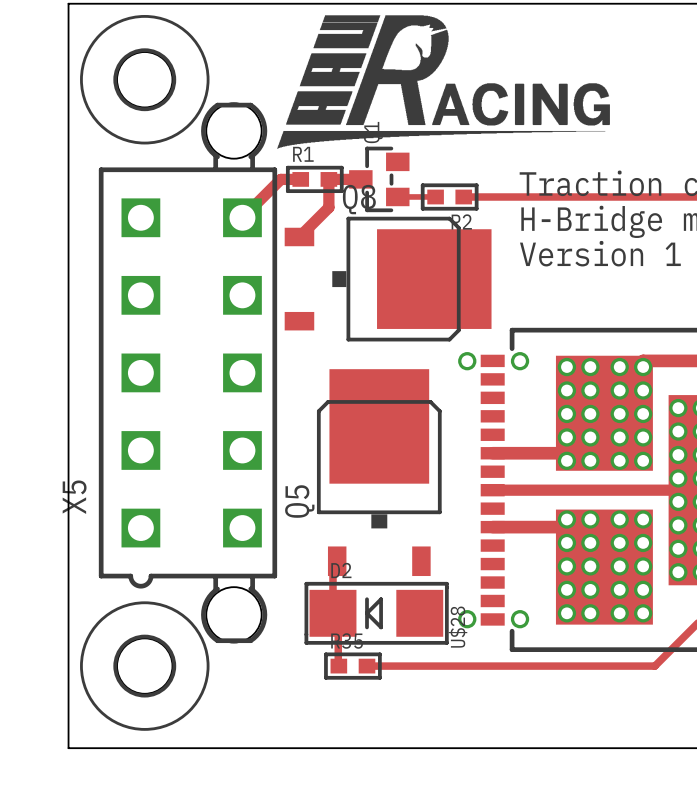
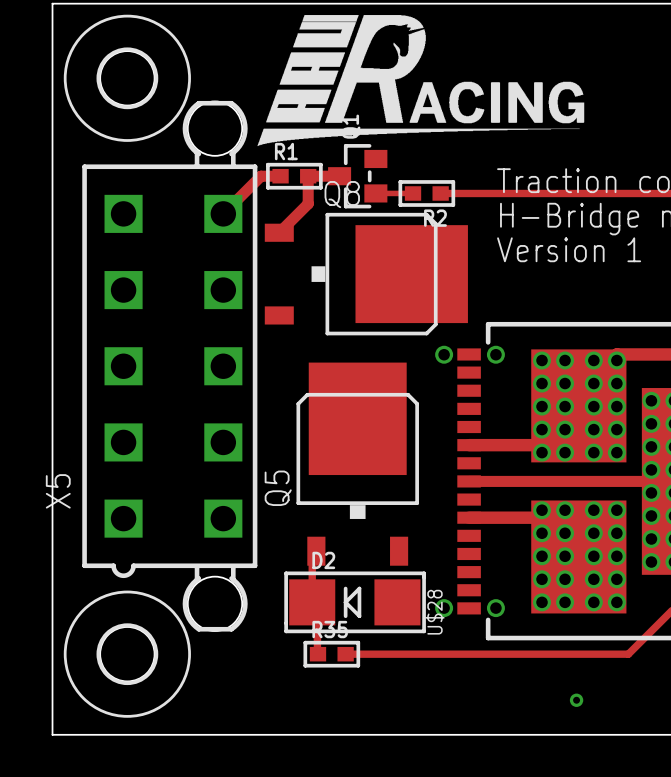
via: none -> (576, 700)

